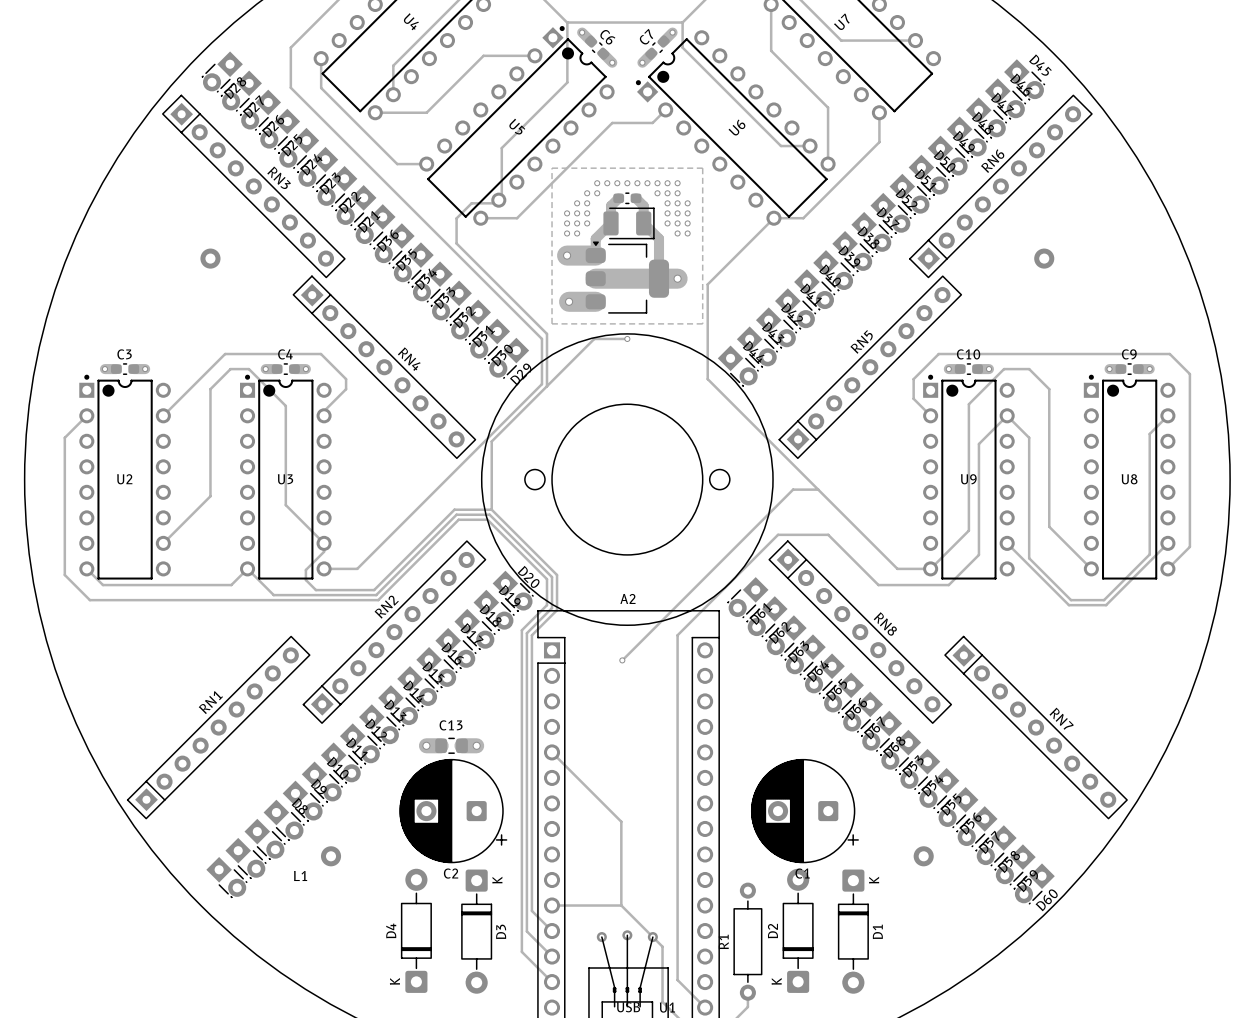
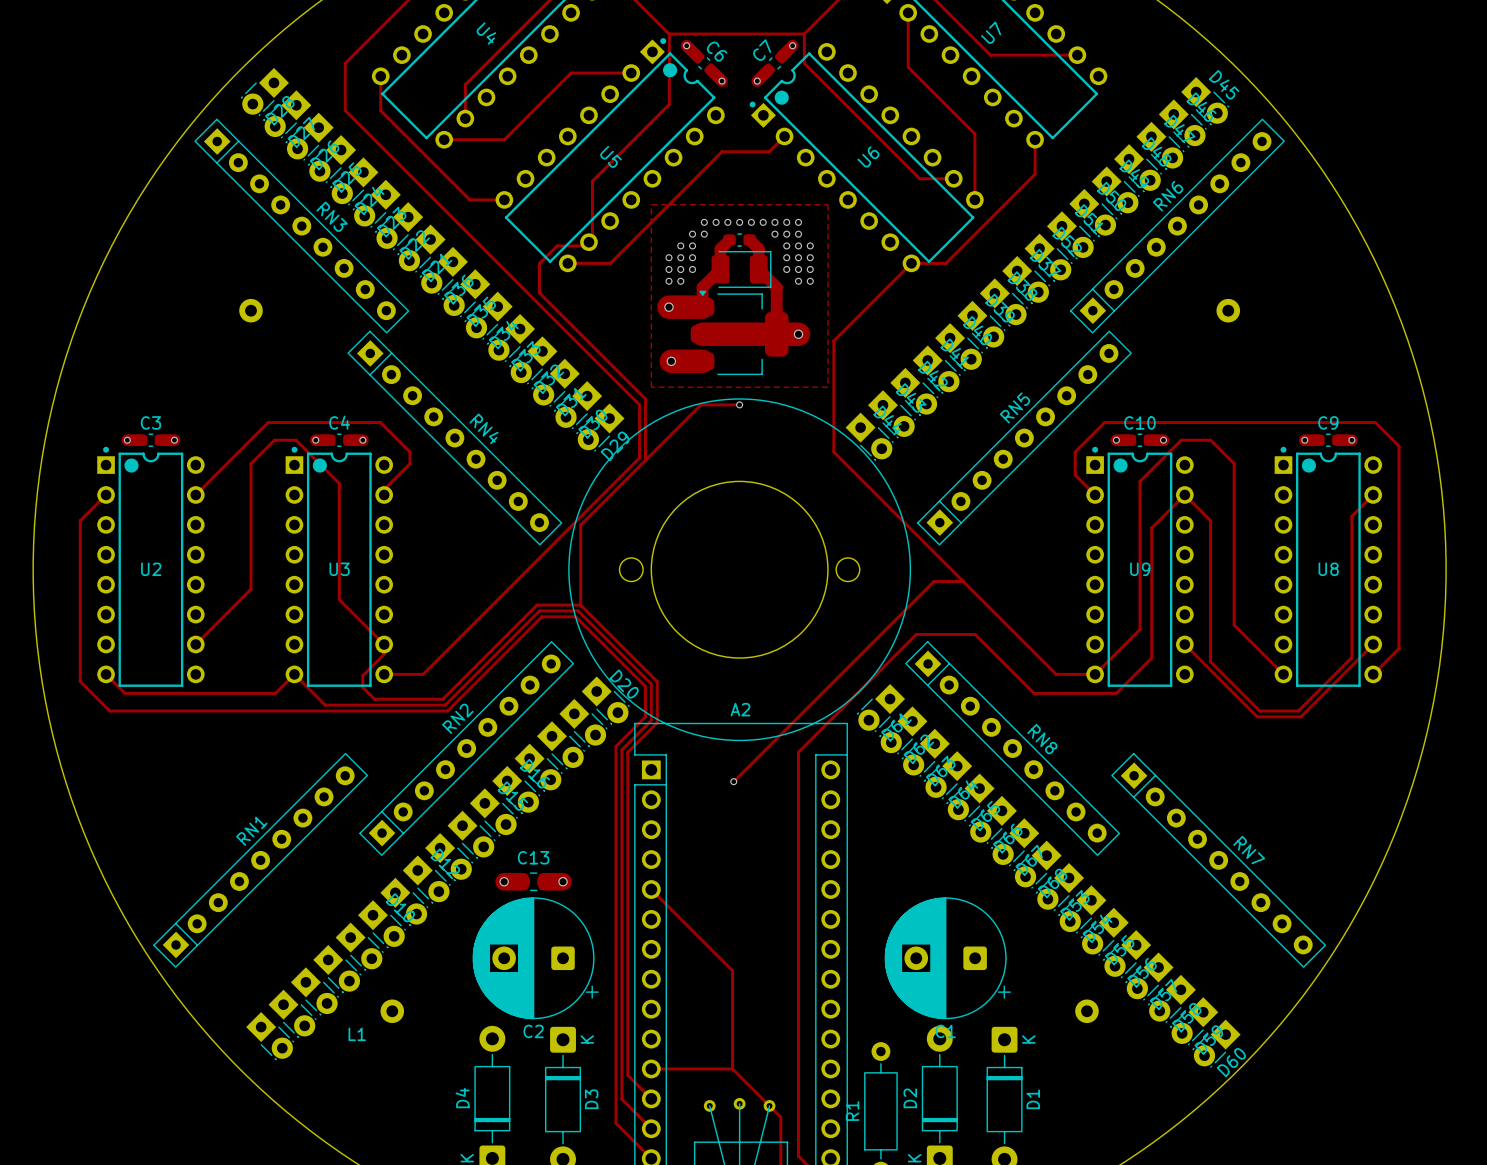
D19 name: D19 (509, 595) -> none
D18 name: D18 (490, 615) -> none
D17 name: D17 (472, 633) -> none
D14 name: D14 (414, 691) -> none
D13 name: D13 (395, 710) -> none
D11 name: D11 (356, 749) -> none
D9 name: D9 (318, 786) -> none
D8 name: D8 (299, 806) -> none

